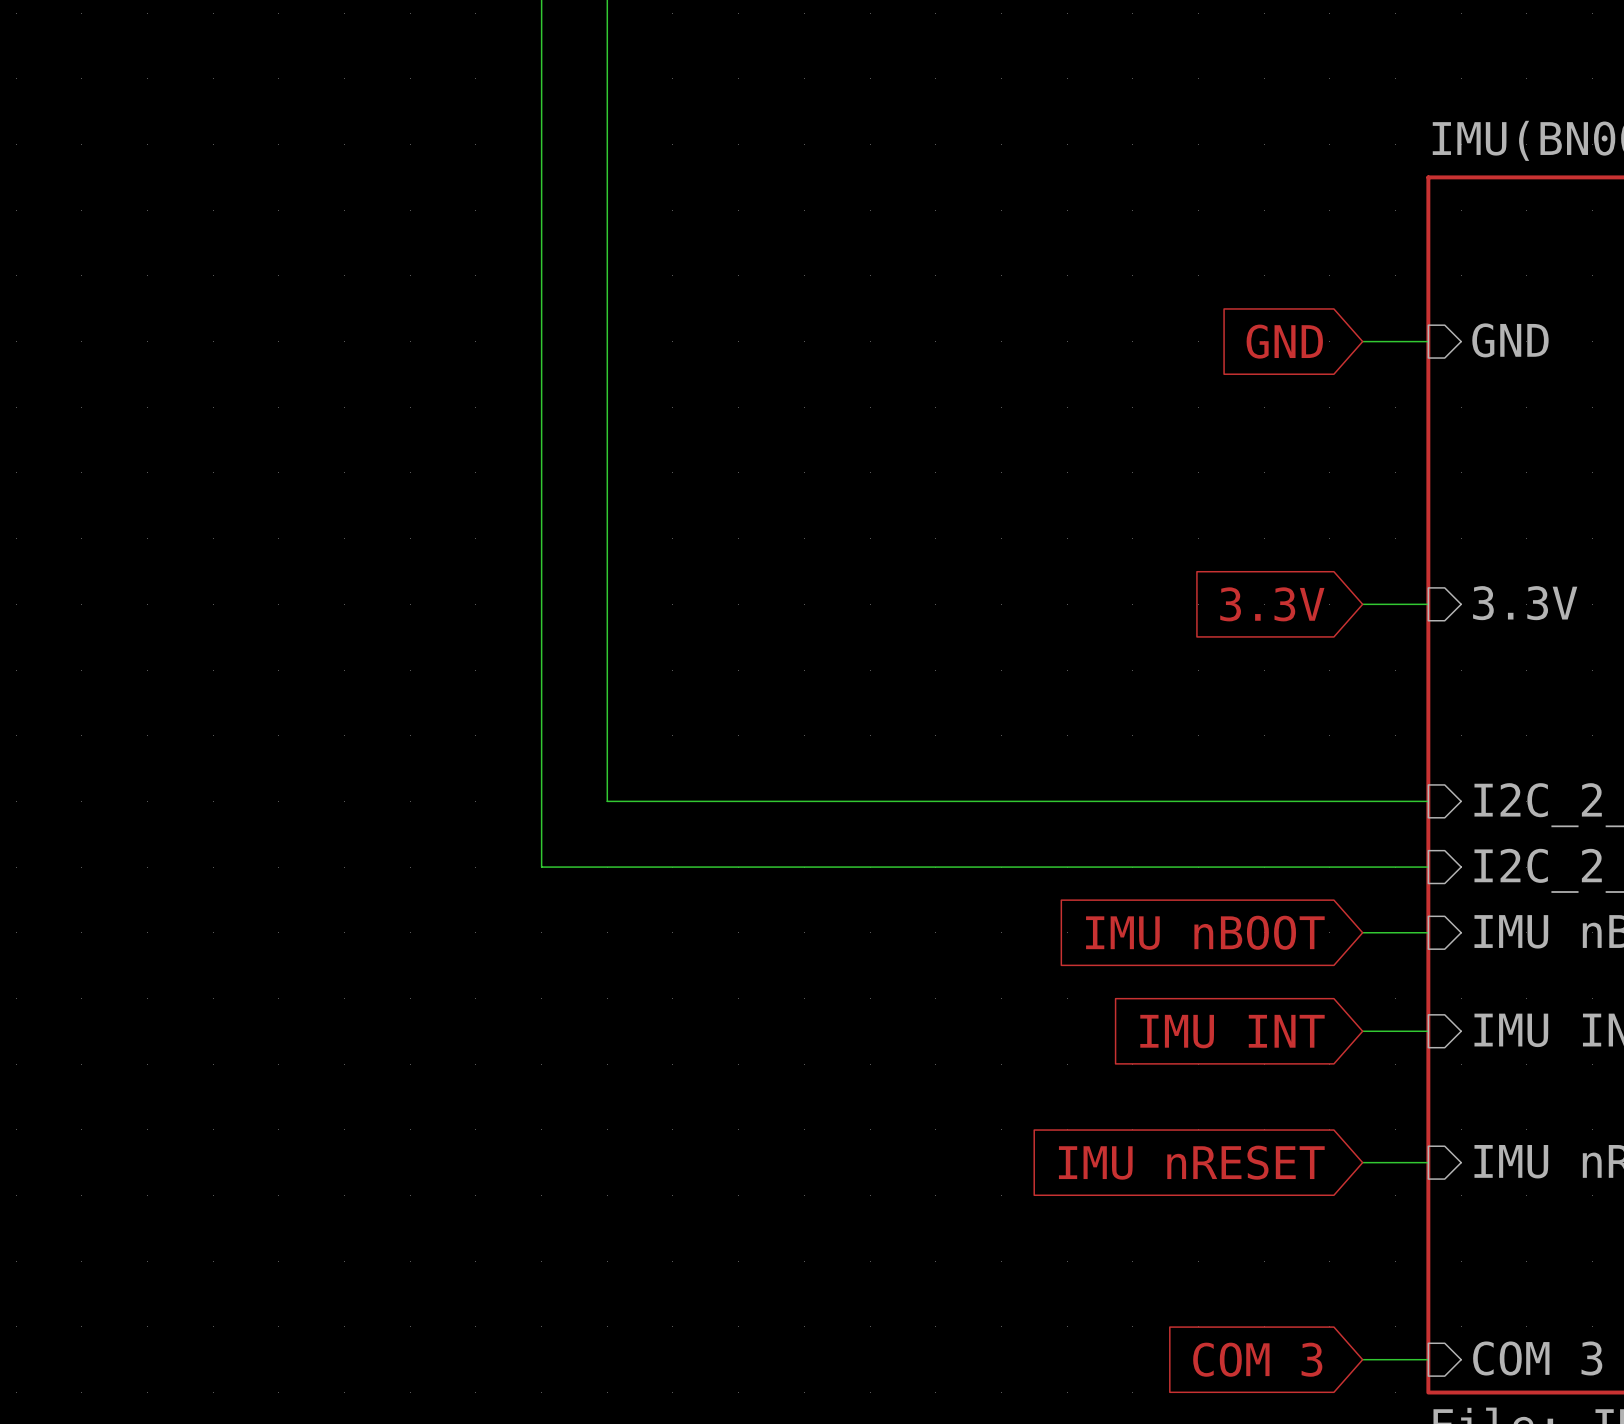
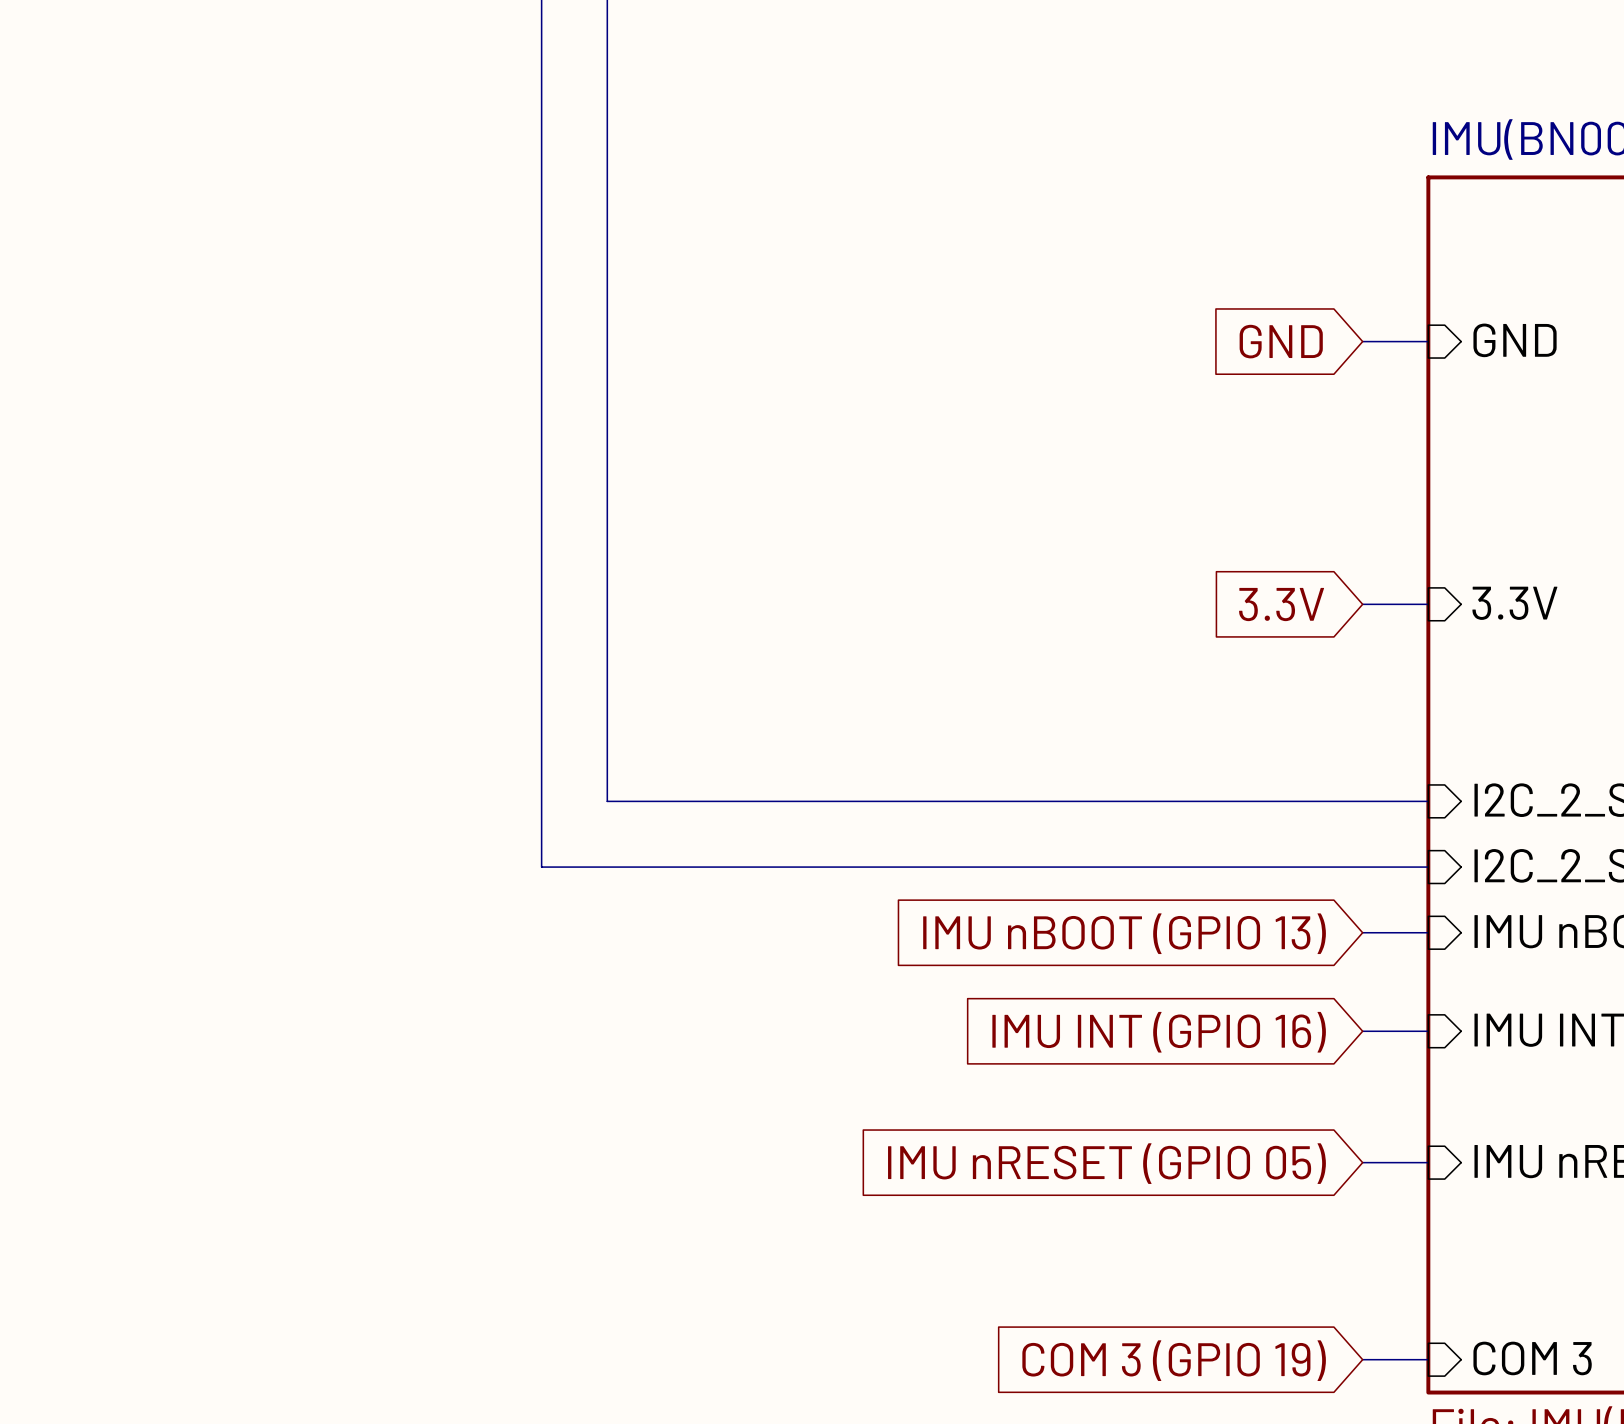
global label: IMU nBOOT (1205, 932) -> IMU nBOOT (GPIO 13) (1124, 933)
global label: IMU INT (1232, 1031) -> IMU INT (GPIO 16) (1159, 1032)
global label: IMU nRESET (1191, 1162) -> IMU nRESET (GPIO 05) (1106, 1163)
global label: COM 3 (1257, 1359) -> COM 3 (GPIO 19) (1174, 1360)

